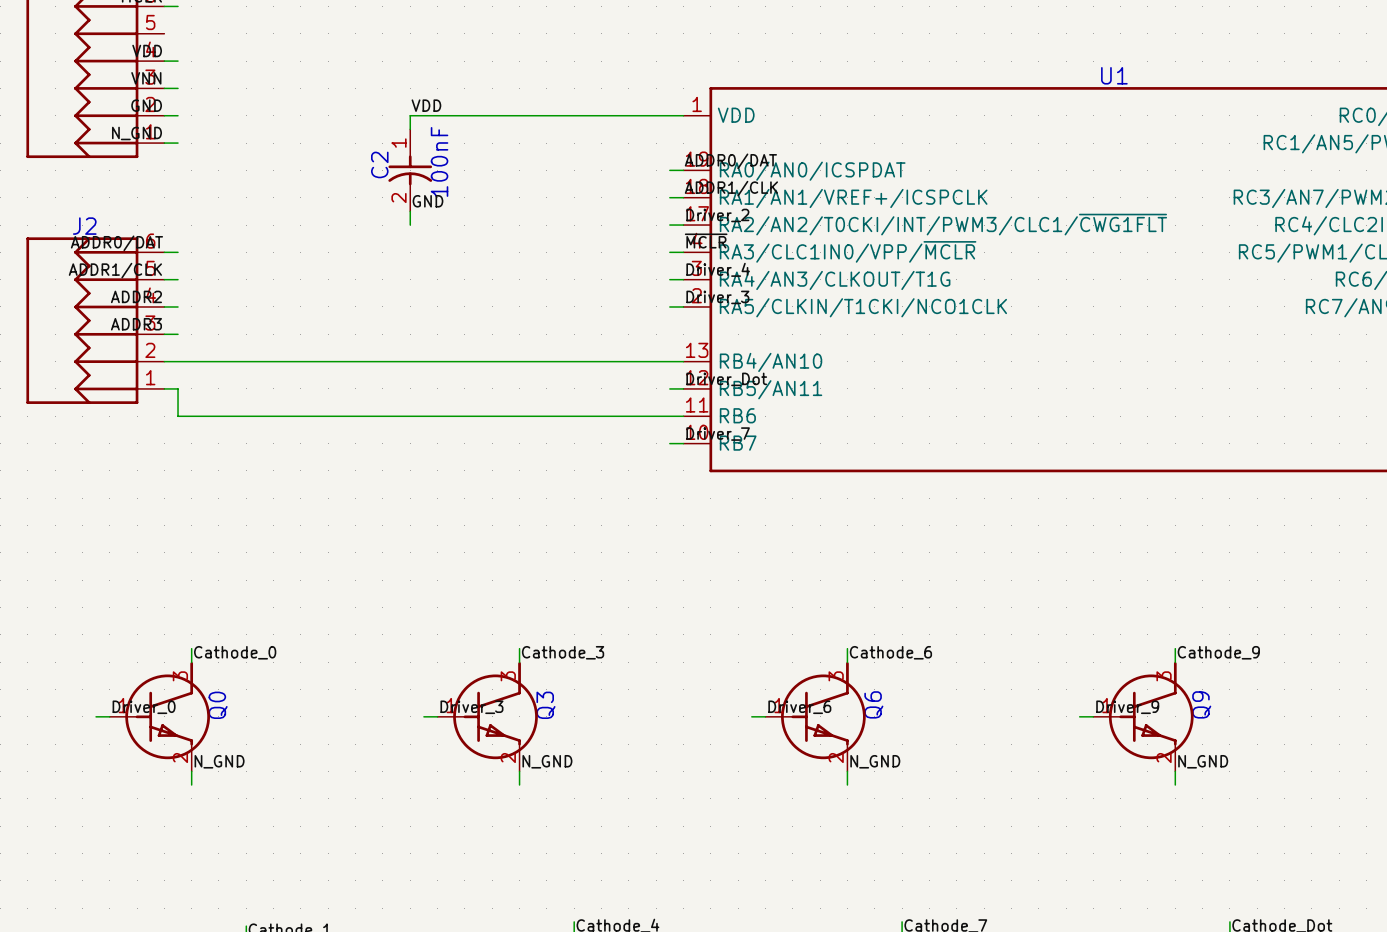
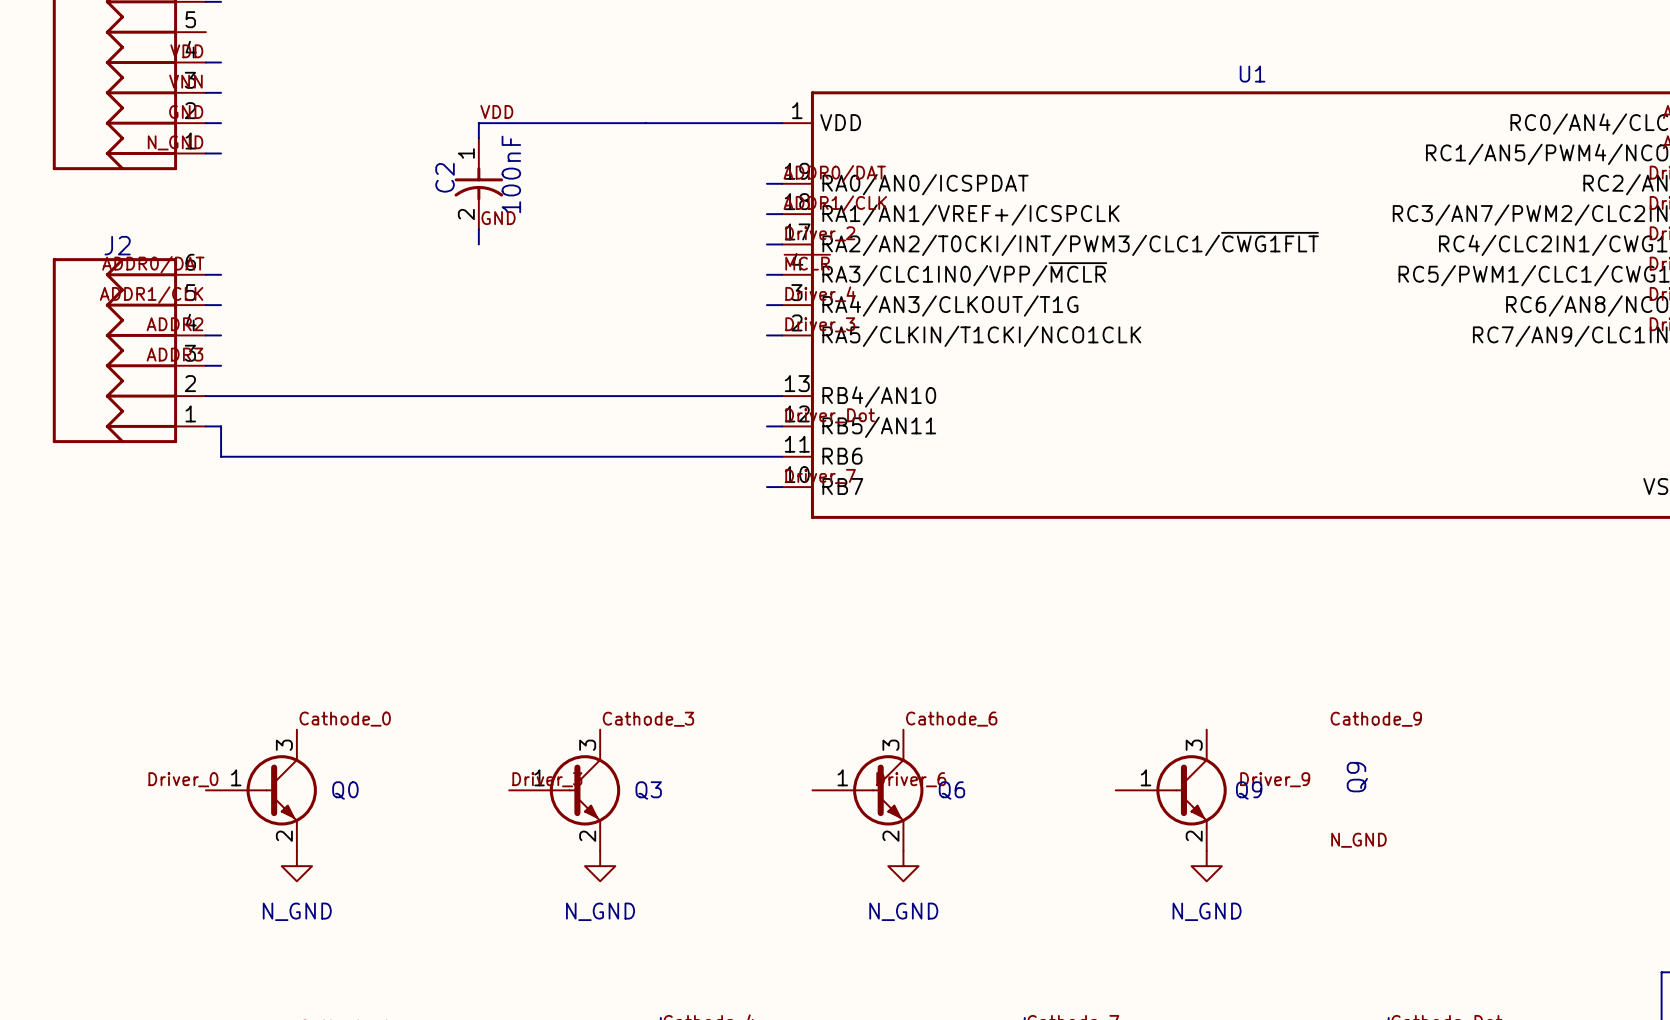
U1 name: none -> U1 (1252, 74)
text: U1 (1114, 75) -> none
wire: (191, 648) (191, 662) -> none
wire: (519, 648) (519, 662) -> none
wire: (1175, 648) (1175, 662) -> none
label position: Cathode_0 (235, 652) -> Cathode_0 (345, 719)
label position: Cathode_6 (890, 652) -> Cathode_6 (951, 719)
text: Q6 (873, 704) -> none
text: Q0 (218, 705) -> none
text: Q3 (545, 705) -> none
wire: (96, 716) (109, 716) -> none
part: (159, 716) -> none
Q0: none -> (261, 790)
wire: (423, 716) (437, 716) -> none
part: (487, 716) -> none
Q3: none -> (564, 790)
Q6: none -> (867, 790)
part: (815, 716) -> none
Q9: none -> (1171, 790)
wire: (1079, 716) (1093, 716) -> none
part: (1143, 716) -> none
label: N_GND (219, 761) -> none
label: N_GND (547, 761) -> none
label: N_GND (875, 761) -> none
wire: (191, 771) (191, 785) -> none
wire: (847, 771) (847, 785) -> none
wire: (1175, 771) (1175, 785) -> none
power symbol: none -> N_GND (296, 866)
power symbol: none -> N_GND (600, 866)
power symbol: none -> N_GND (903, 866)
power symbol: none -> N_GND (1206, 866)

